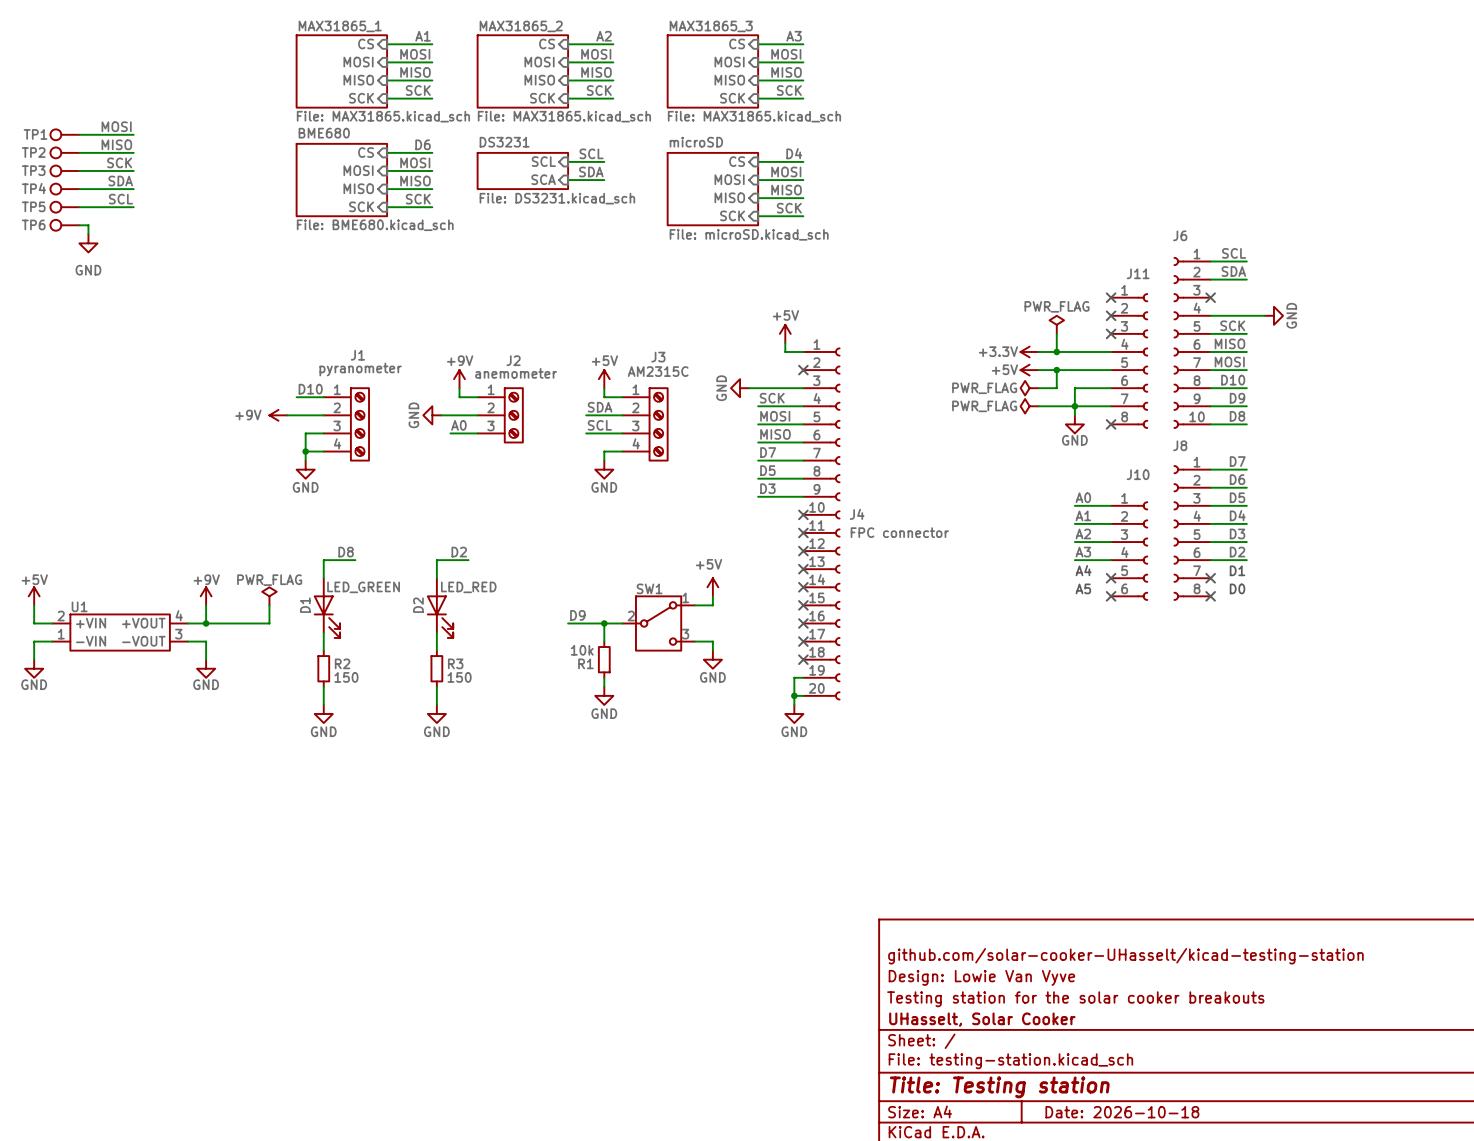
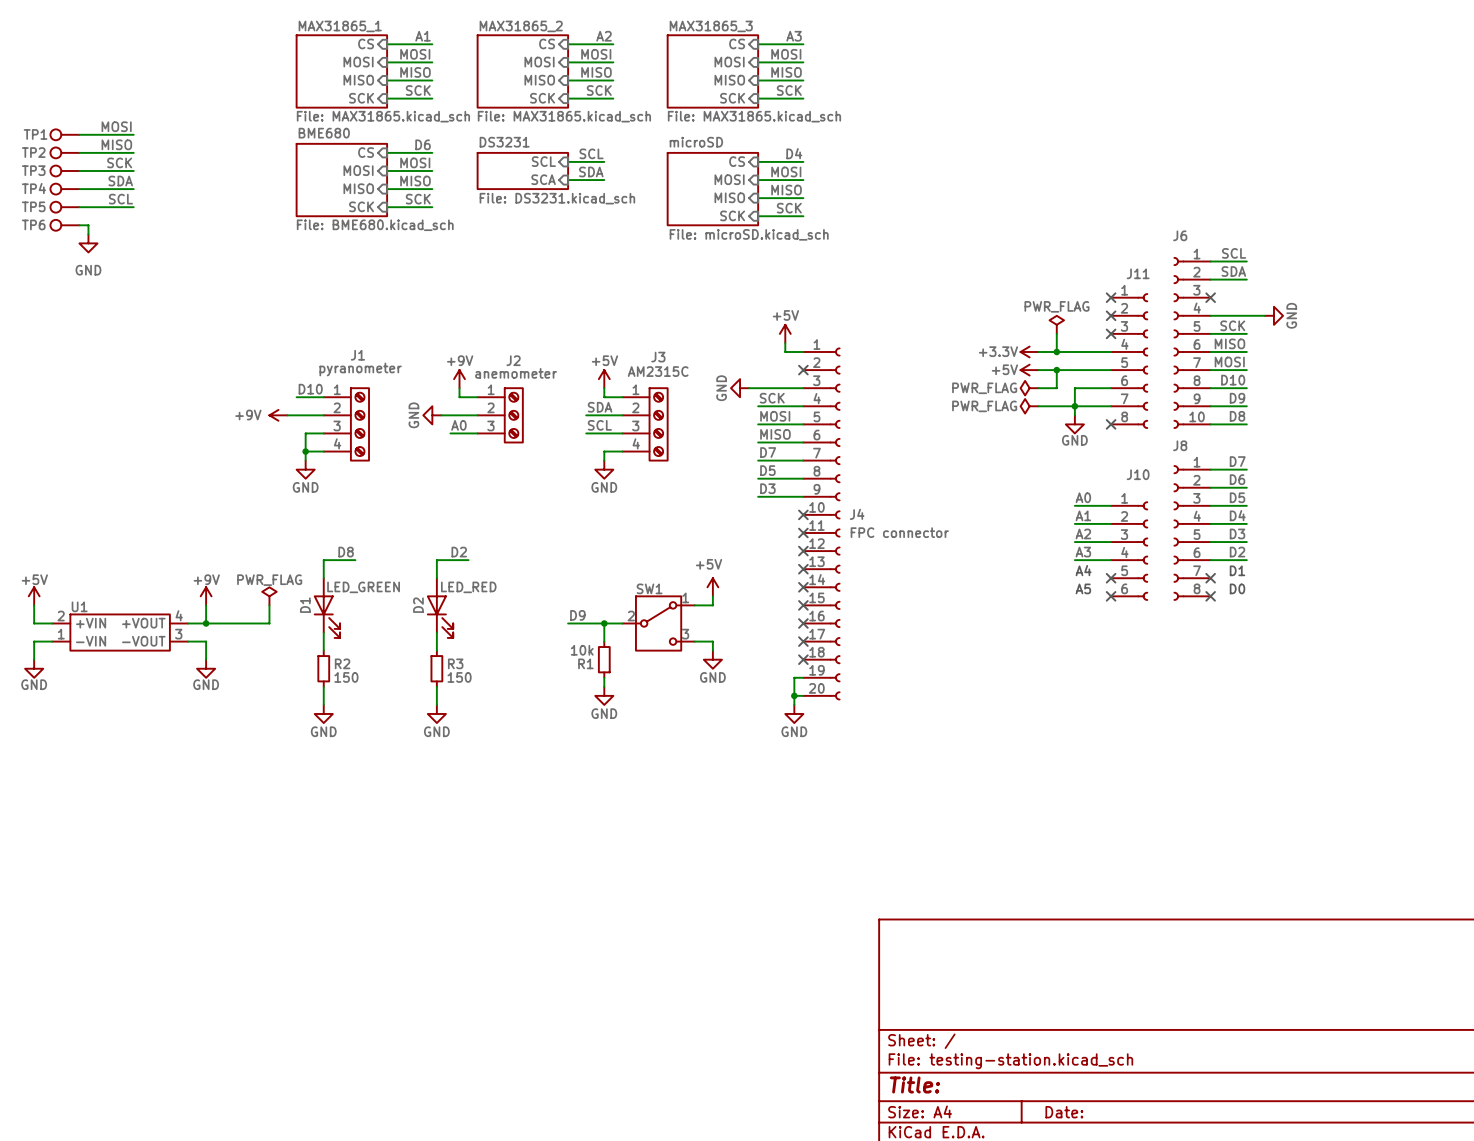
title block: github.com/solar-cooker-UHasselt/kicad-testing-station (1125, 956) -> none
title block: Design: Lowie Van Vyve (981, 977) -> none
title block: Testing station for the solar cooker breakouts (1075, 999) -> none
title block: UHasselt, Solar Cooker (982, 1019) -> none
title block: Title: Testing station (999, 1087) -> Title: (914, 1084)
title block: Date: 2026-10-18 (1122, 1112) -> Date: (1064, 1112)

